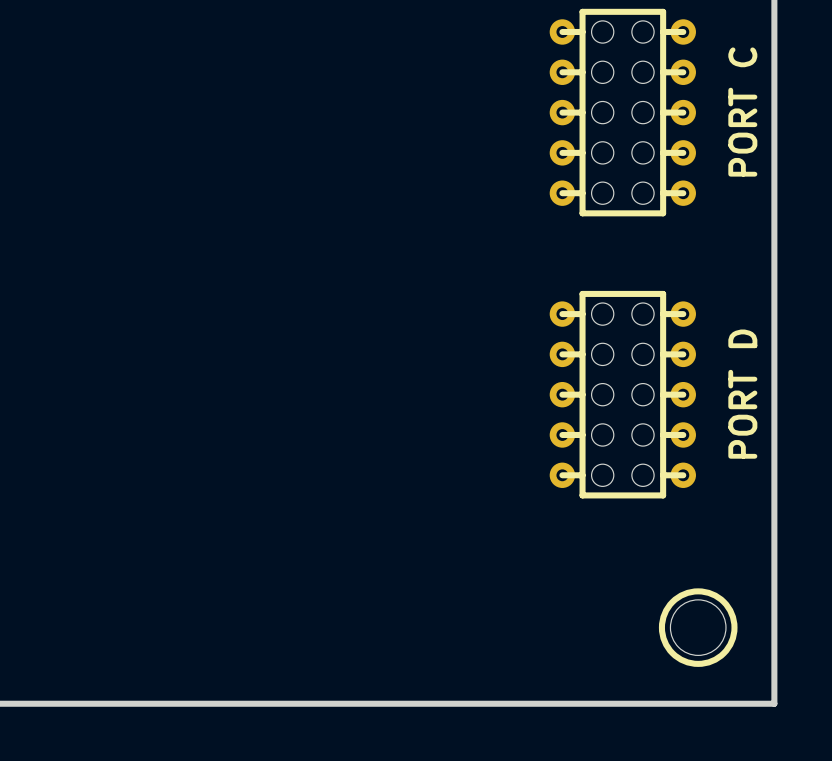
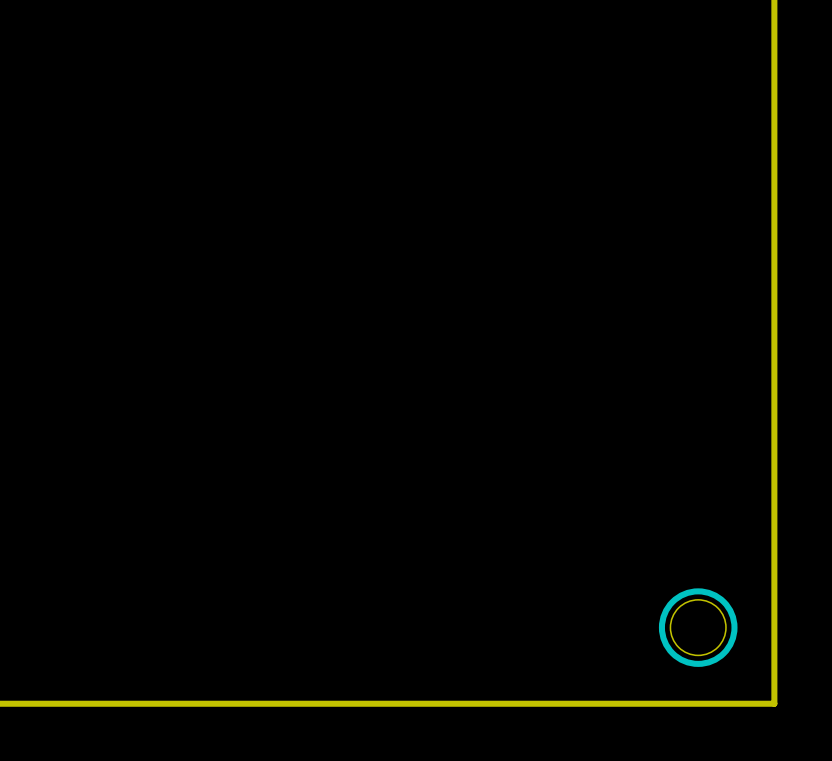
part: PORT C (622, 112) -> none
part: PORT D (622, 394) -> none

